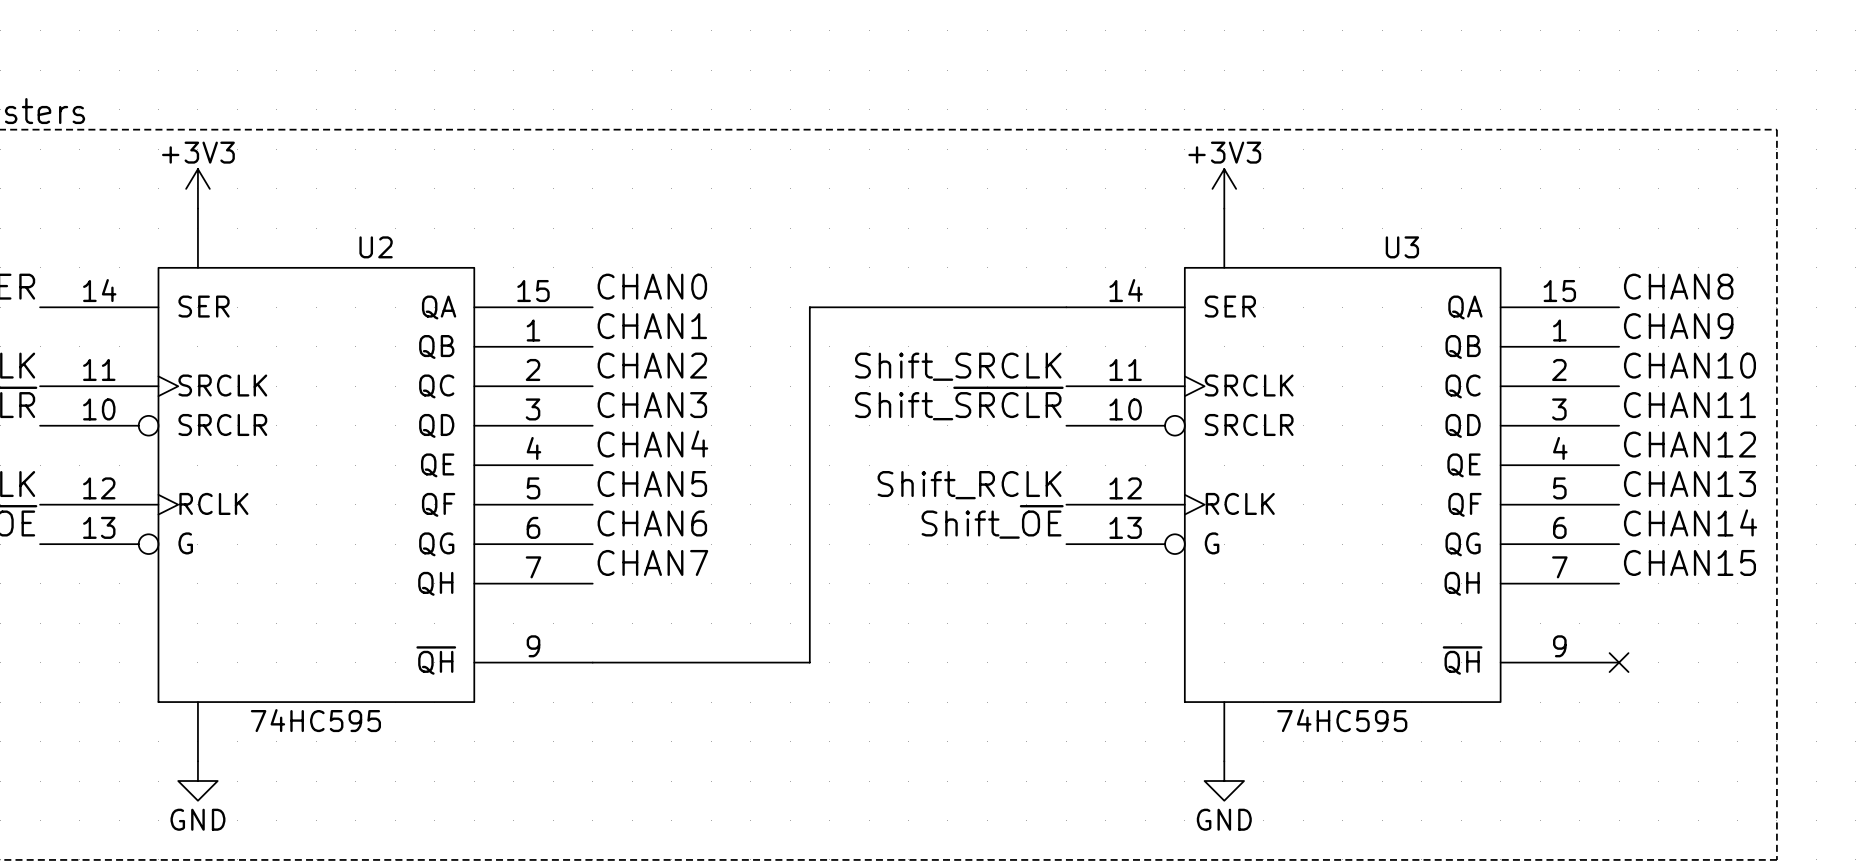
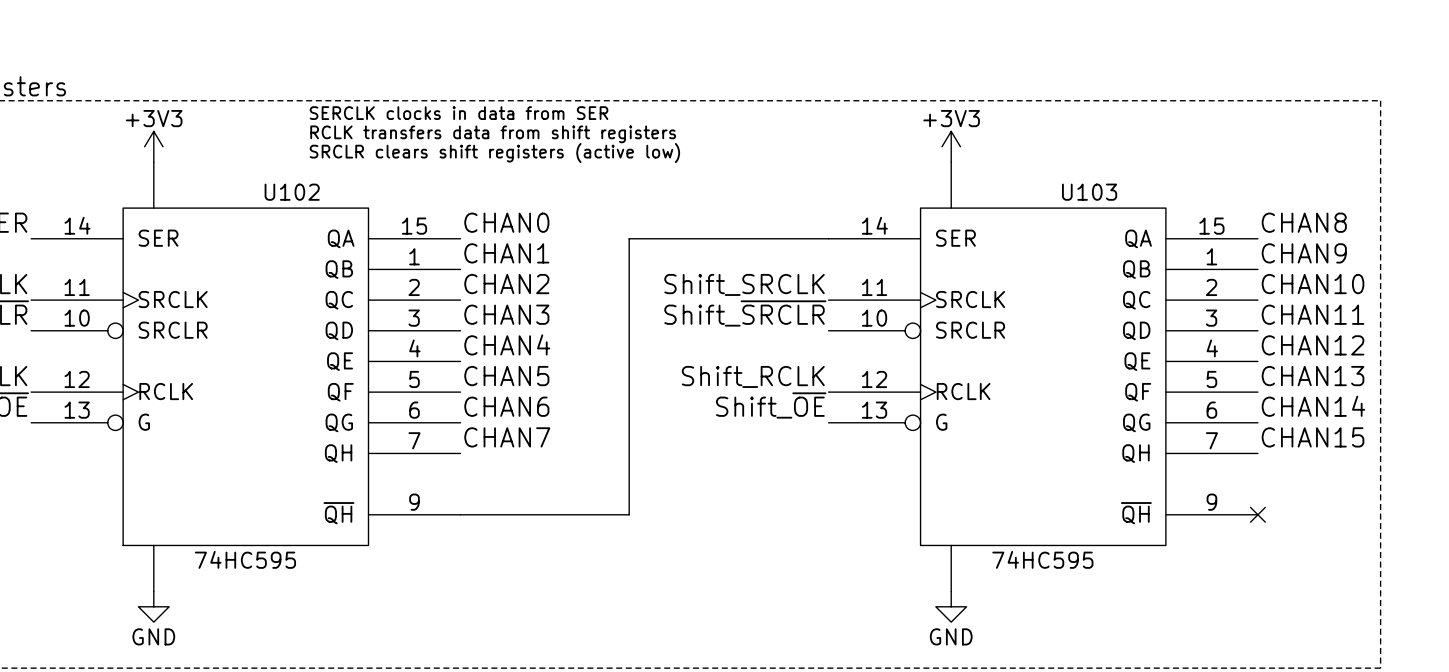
text: none -> SERCLK clocks in data from SER (459, 113)
text: none -> RCLK transfers data from shift registers (493, 134)
text: none -> SRCLR clears shift registers (active low) (494, 153)
U2 name: U2 (376, 247) -> U102 (292, 192)
U3 name: U3 (1402, 247) -> U103 (1089, 192)

